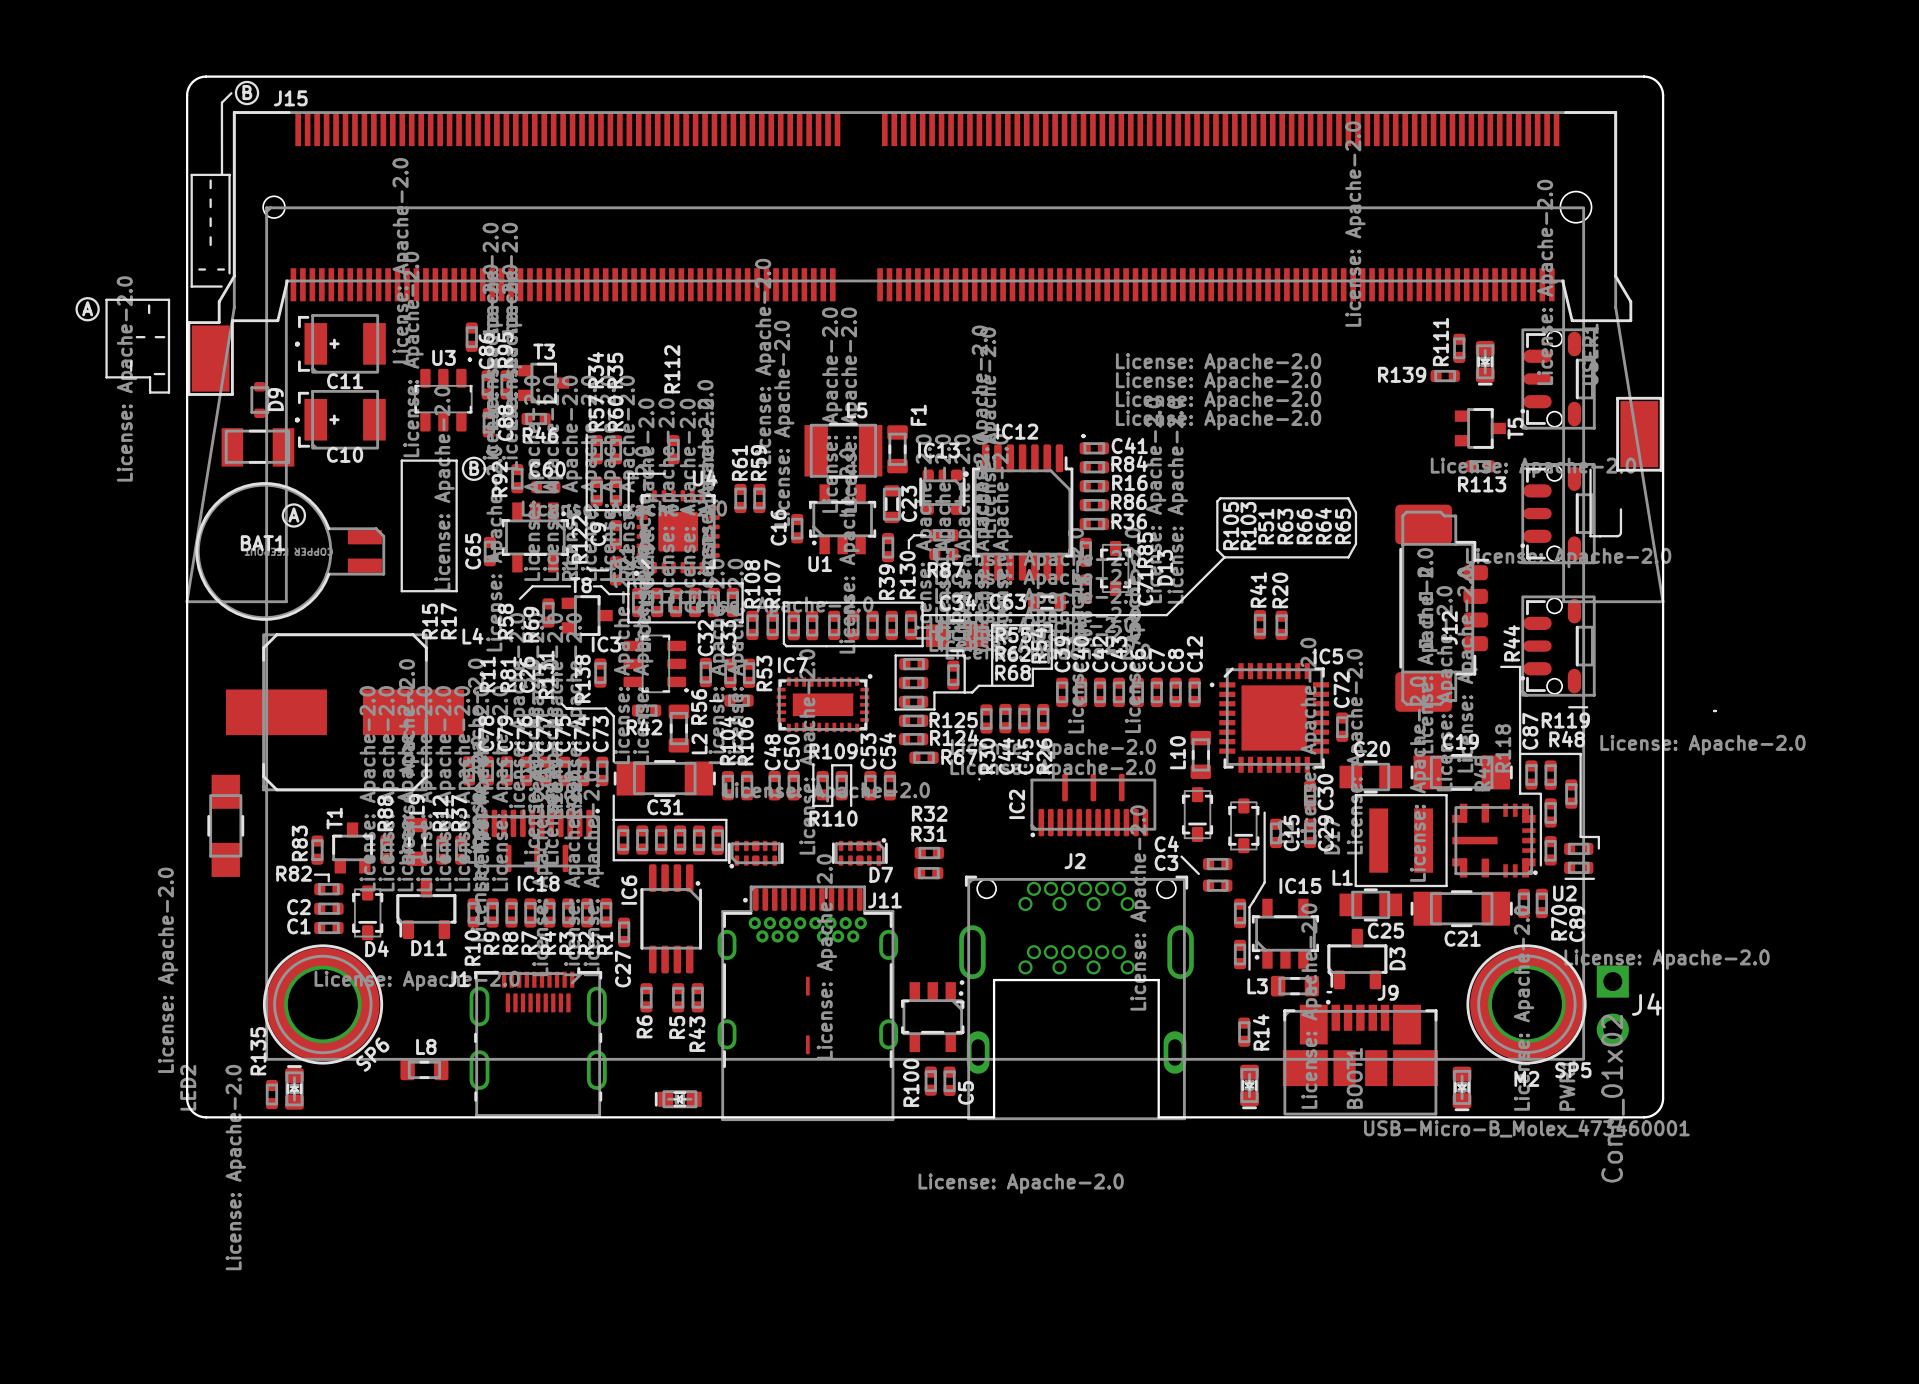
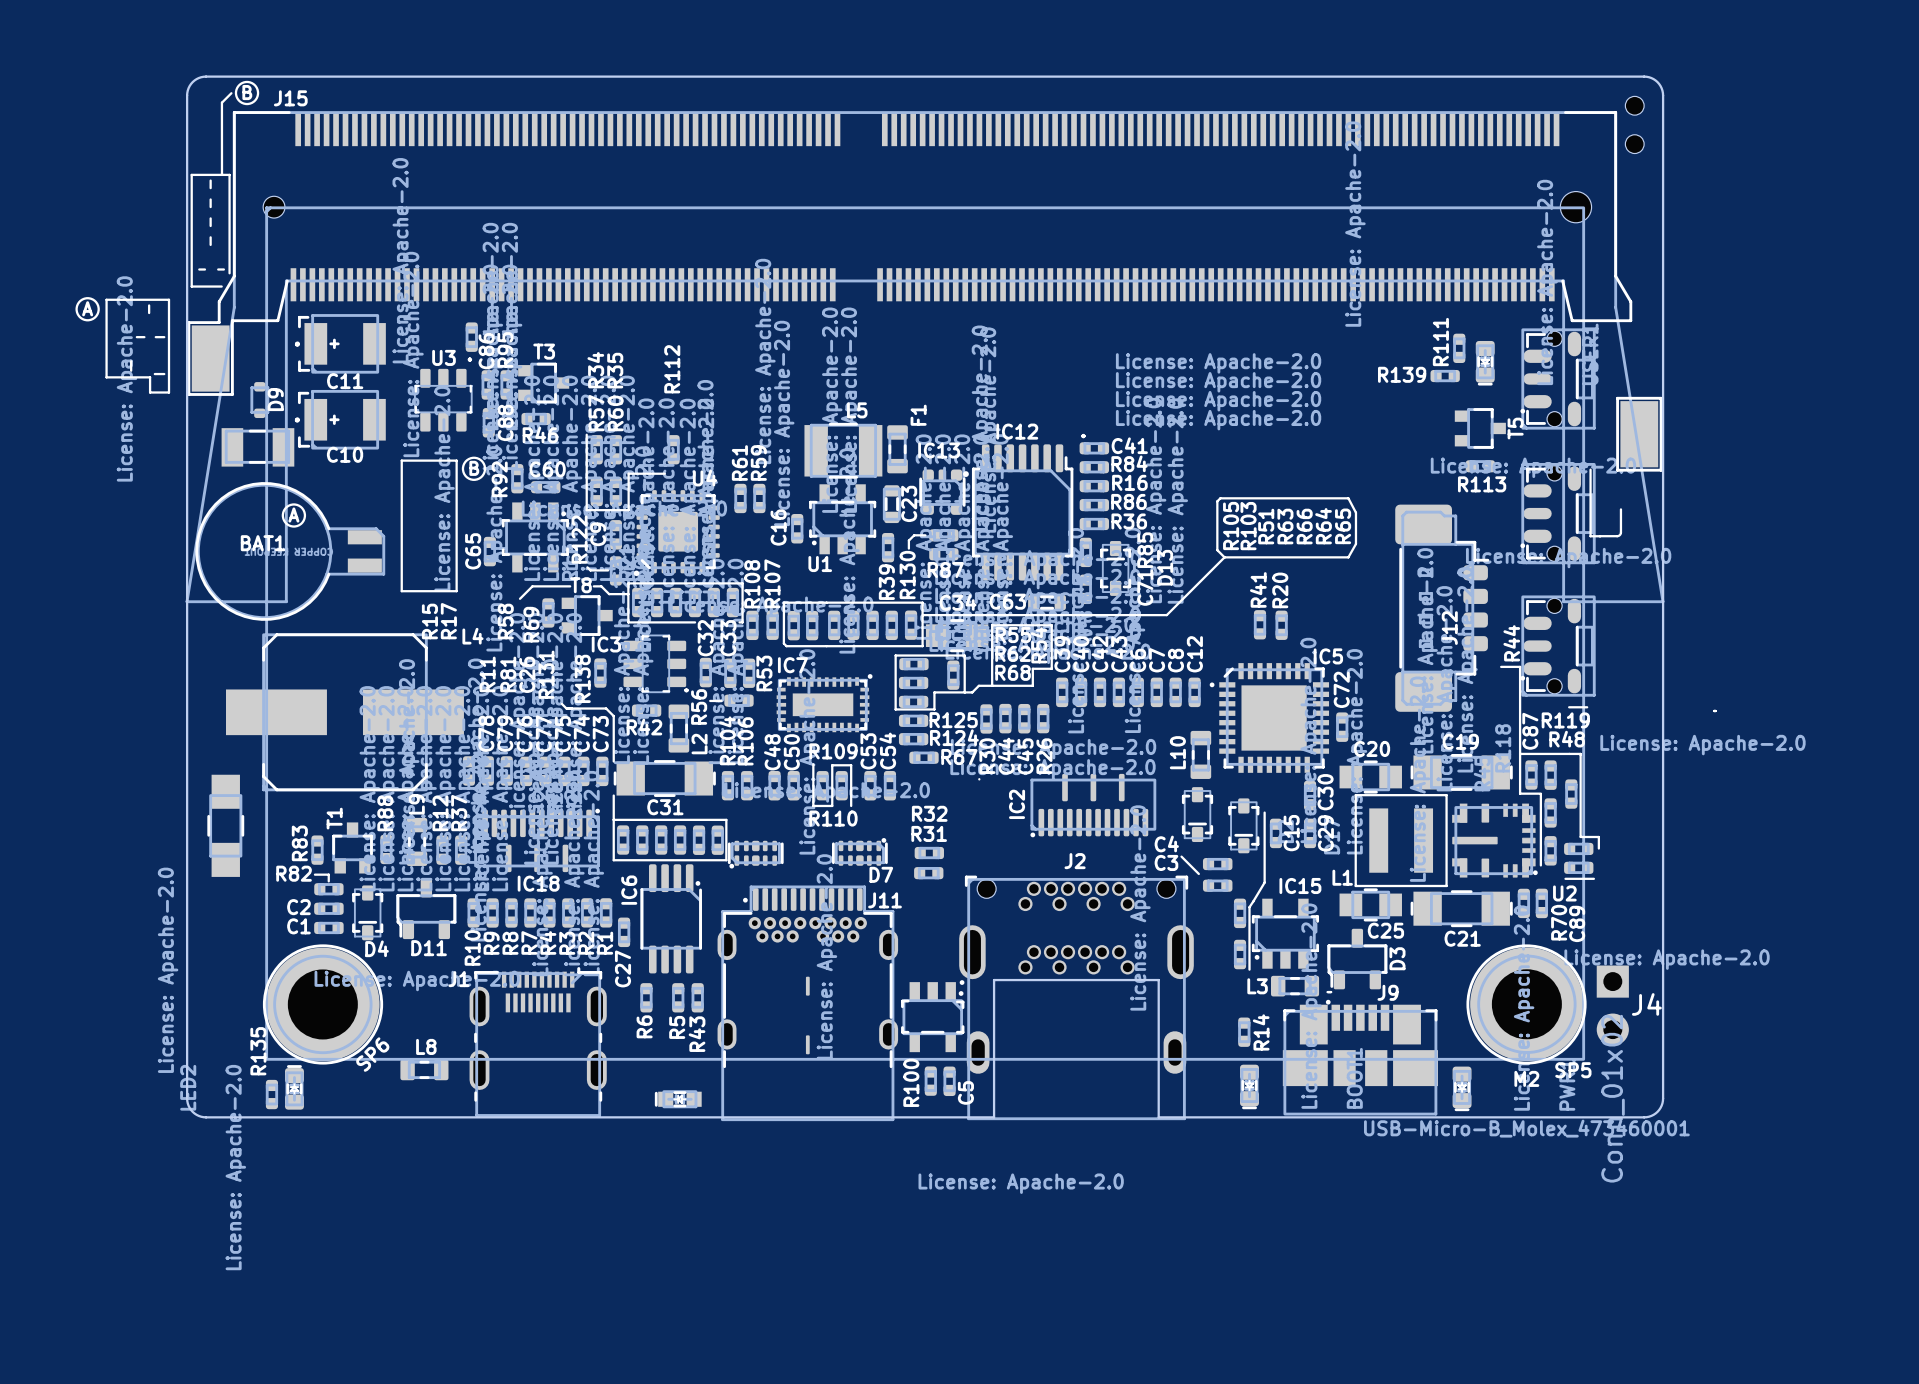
part: none -> (1634, 124)

